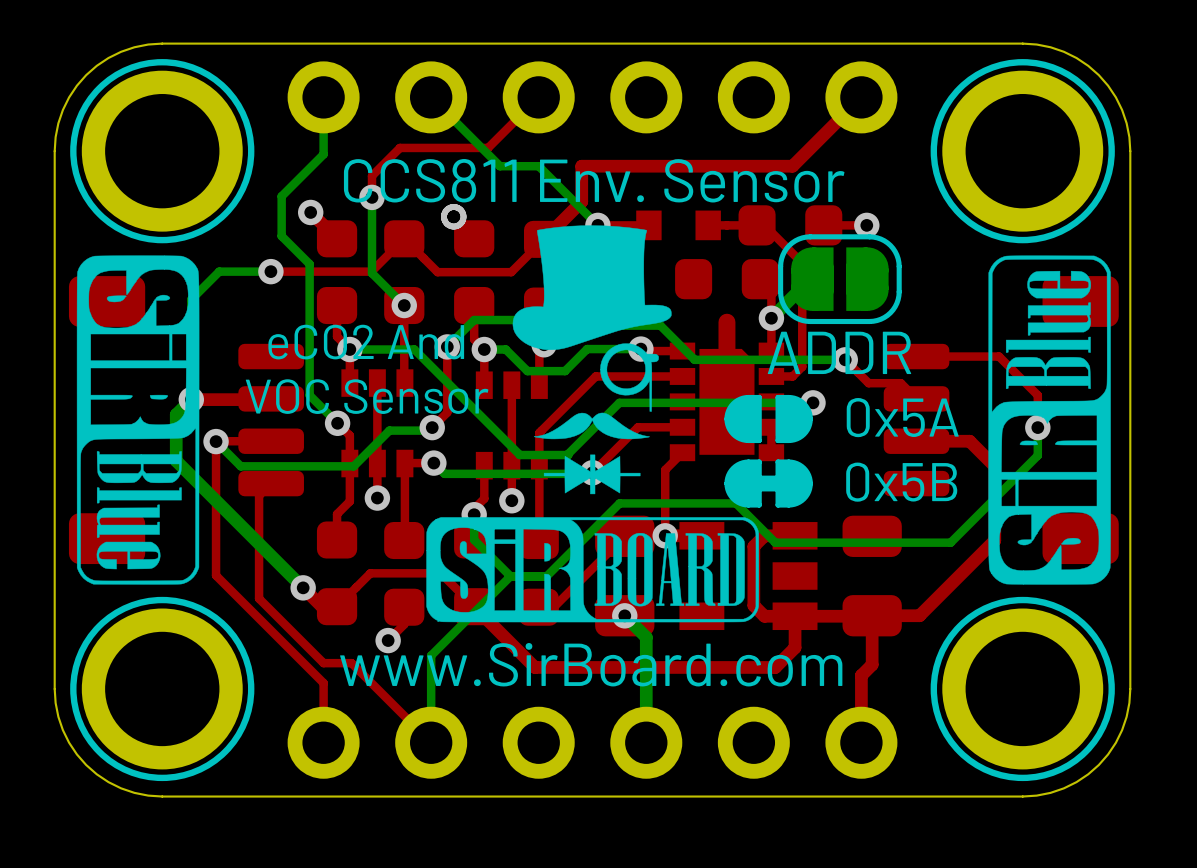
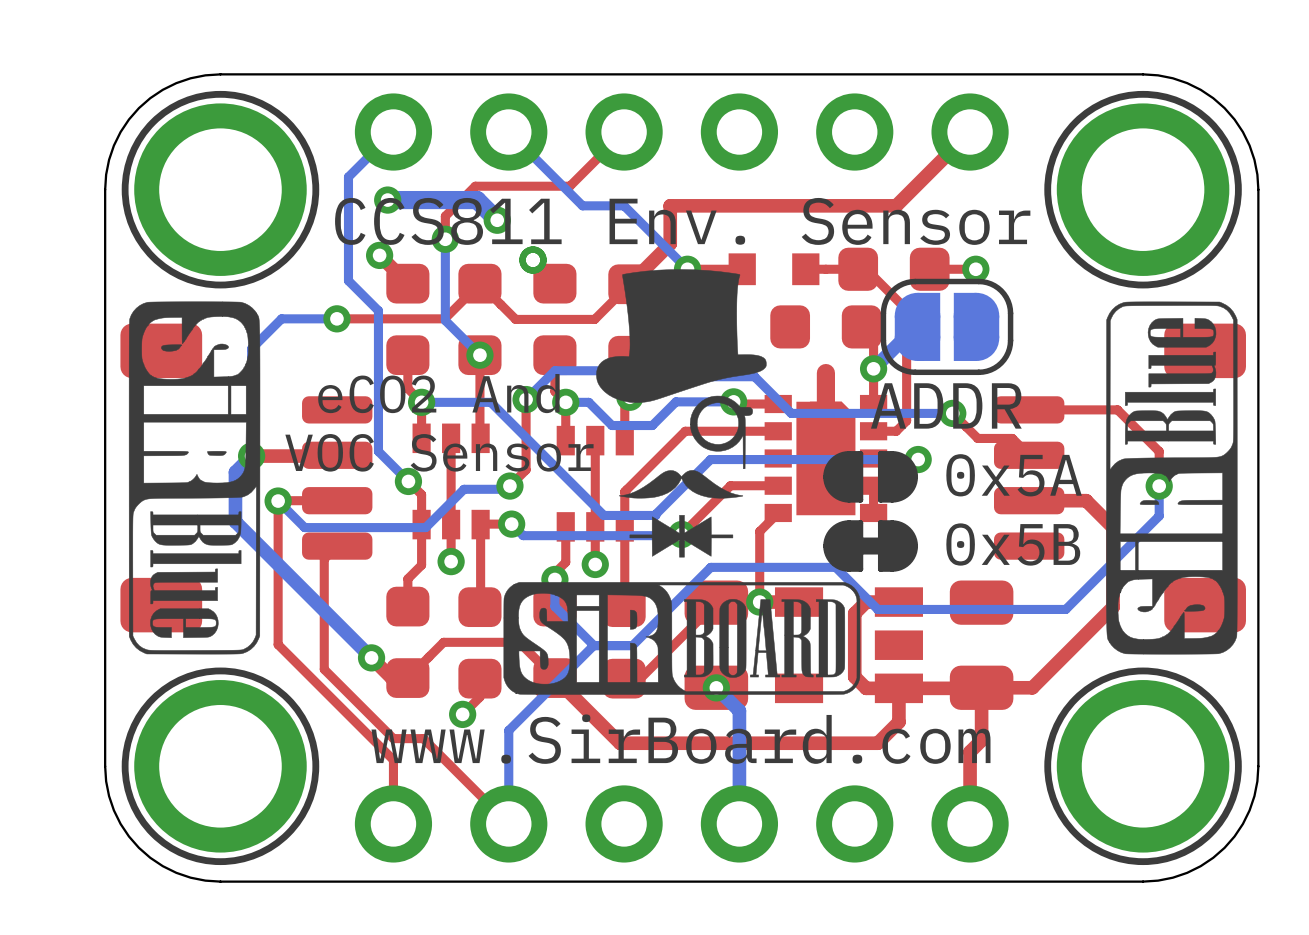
bottom track: (323, 97) (323, 154) (281, 196) -> (393, 132) (348, 177) (348, 238)
bottom track: none -> (387, 200) (477, 200) (497, 220)
via: none -> (387, 200)
via: none -> (497, 220)

